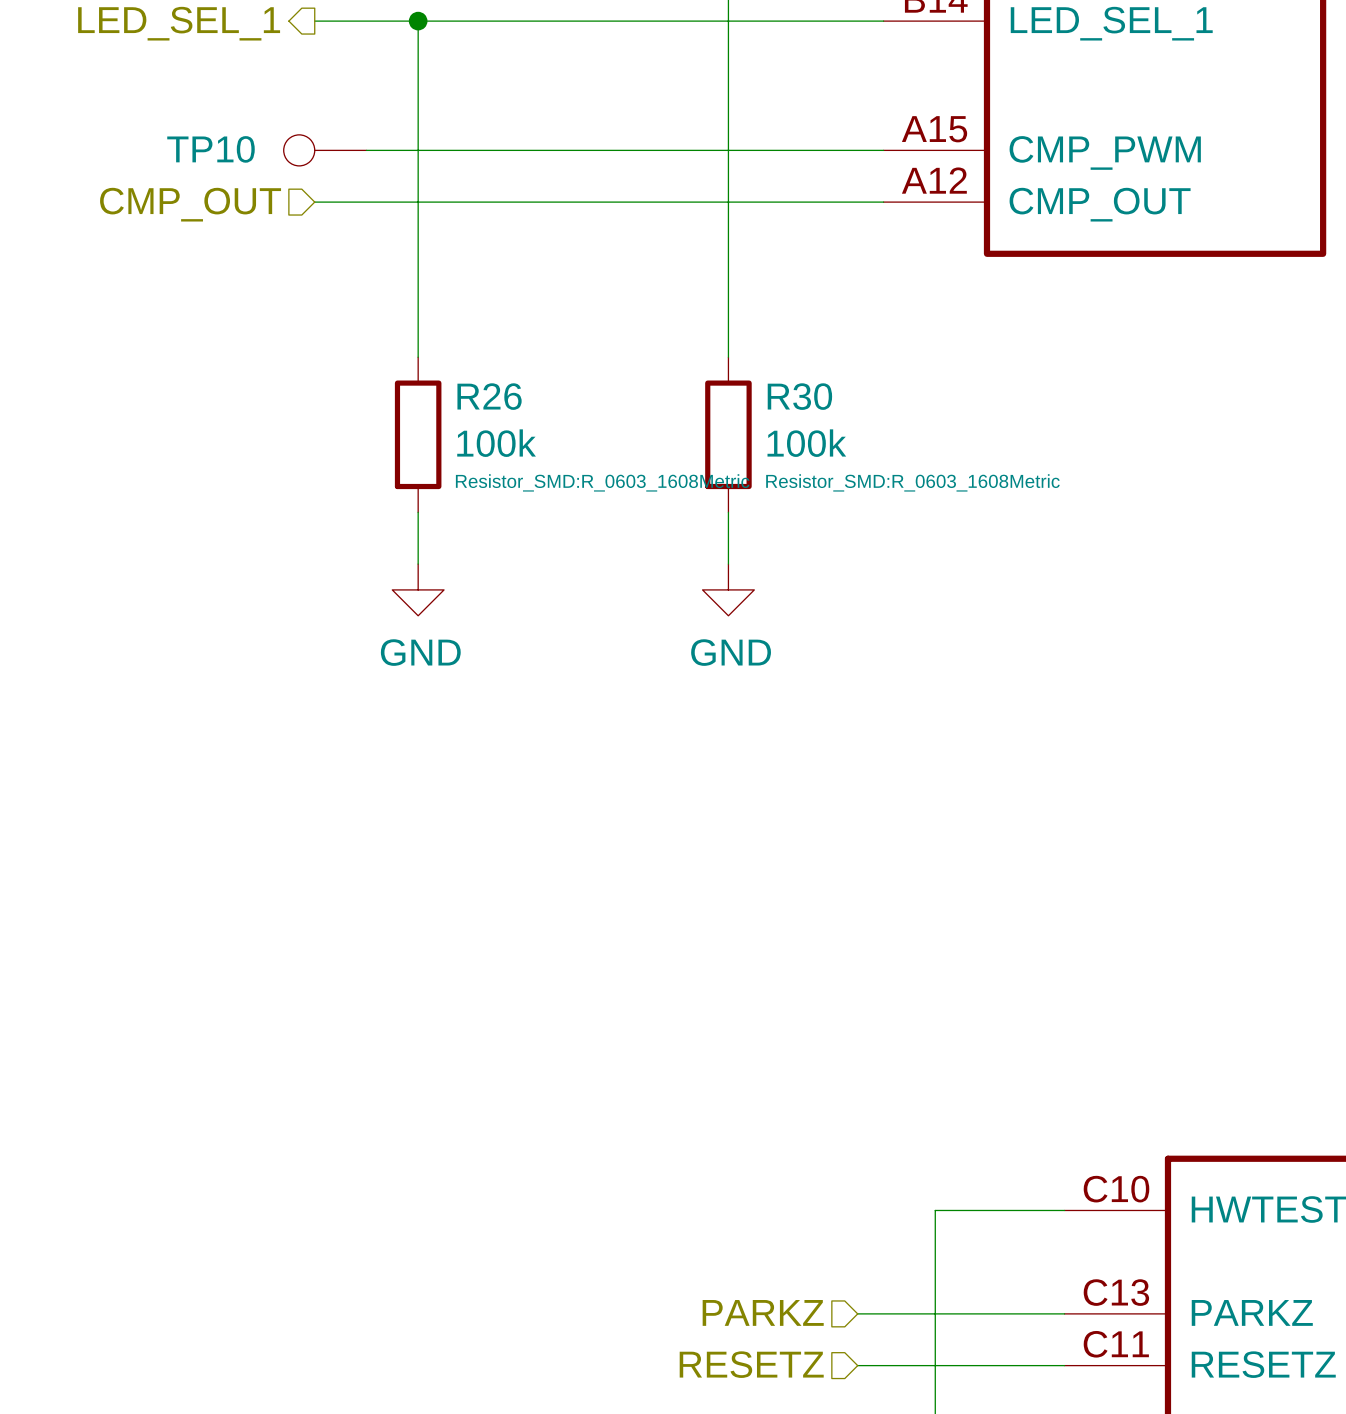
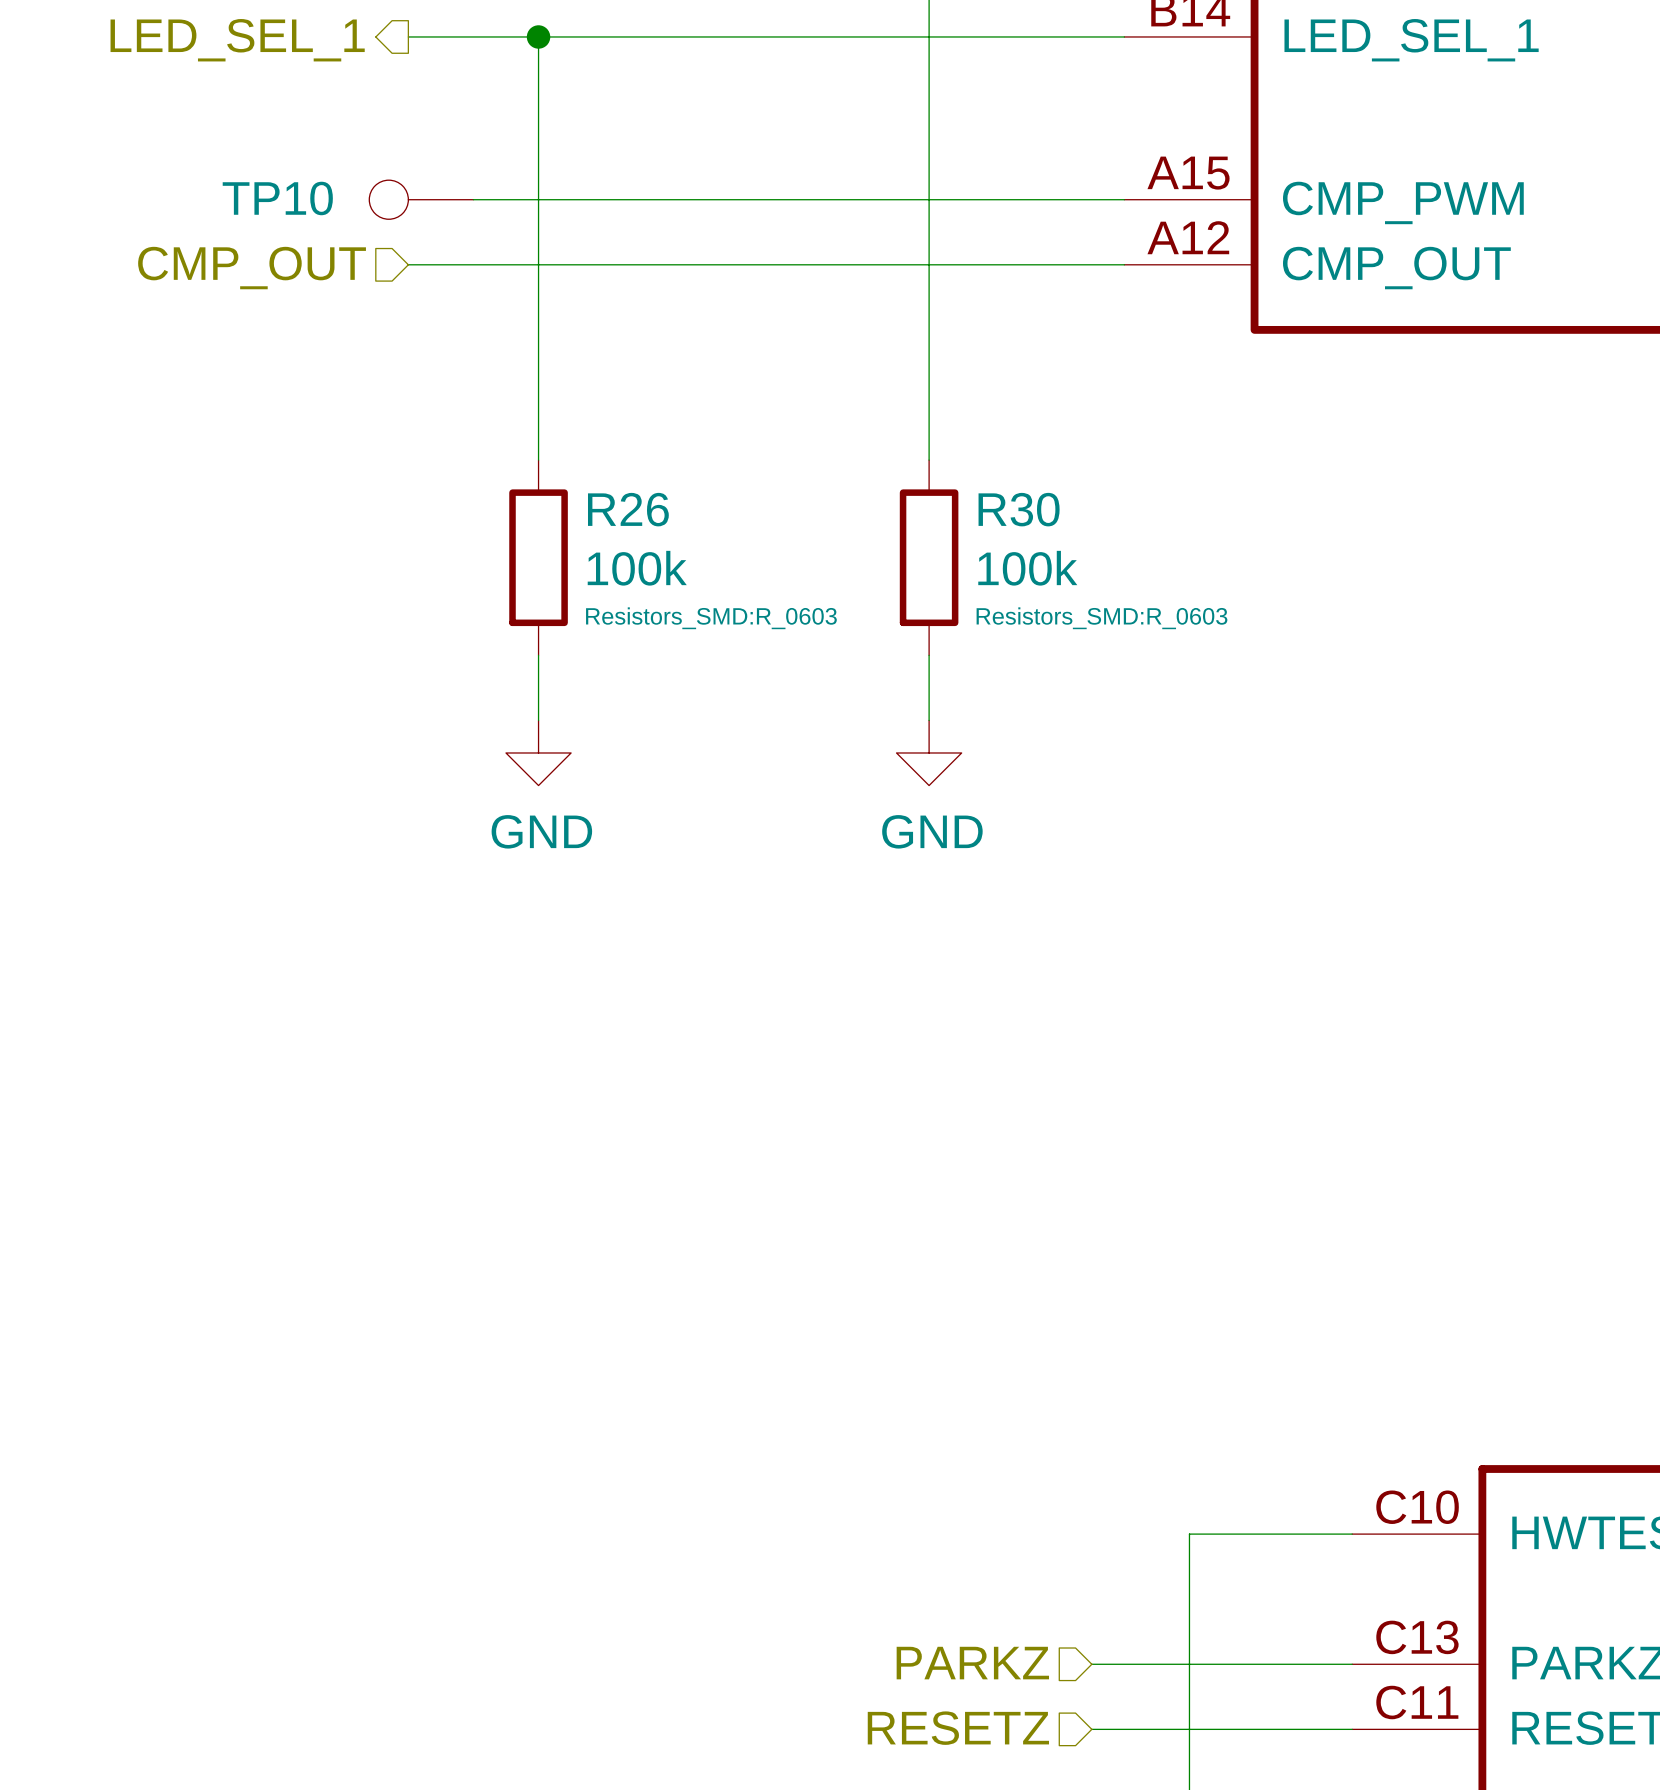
R26 text: Resistor_SMD:R_0603_1608Metric (602, 482) -> Resistors_SMD:R_0603 (711, 618)
R30 text: Resistor_SMD:R_0603_1608Metric (912, 482) -> Resistors_SMD:R_0603 (1101, 618)

